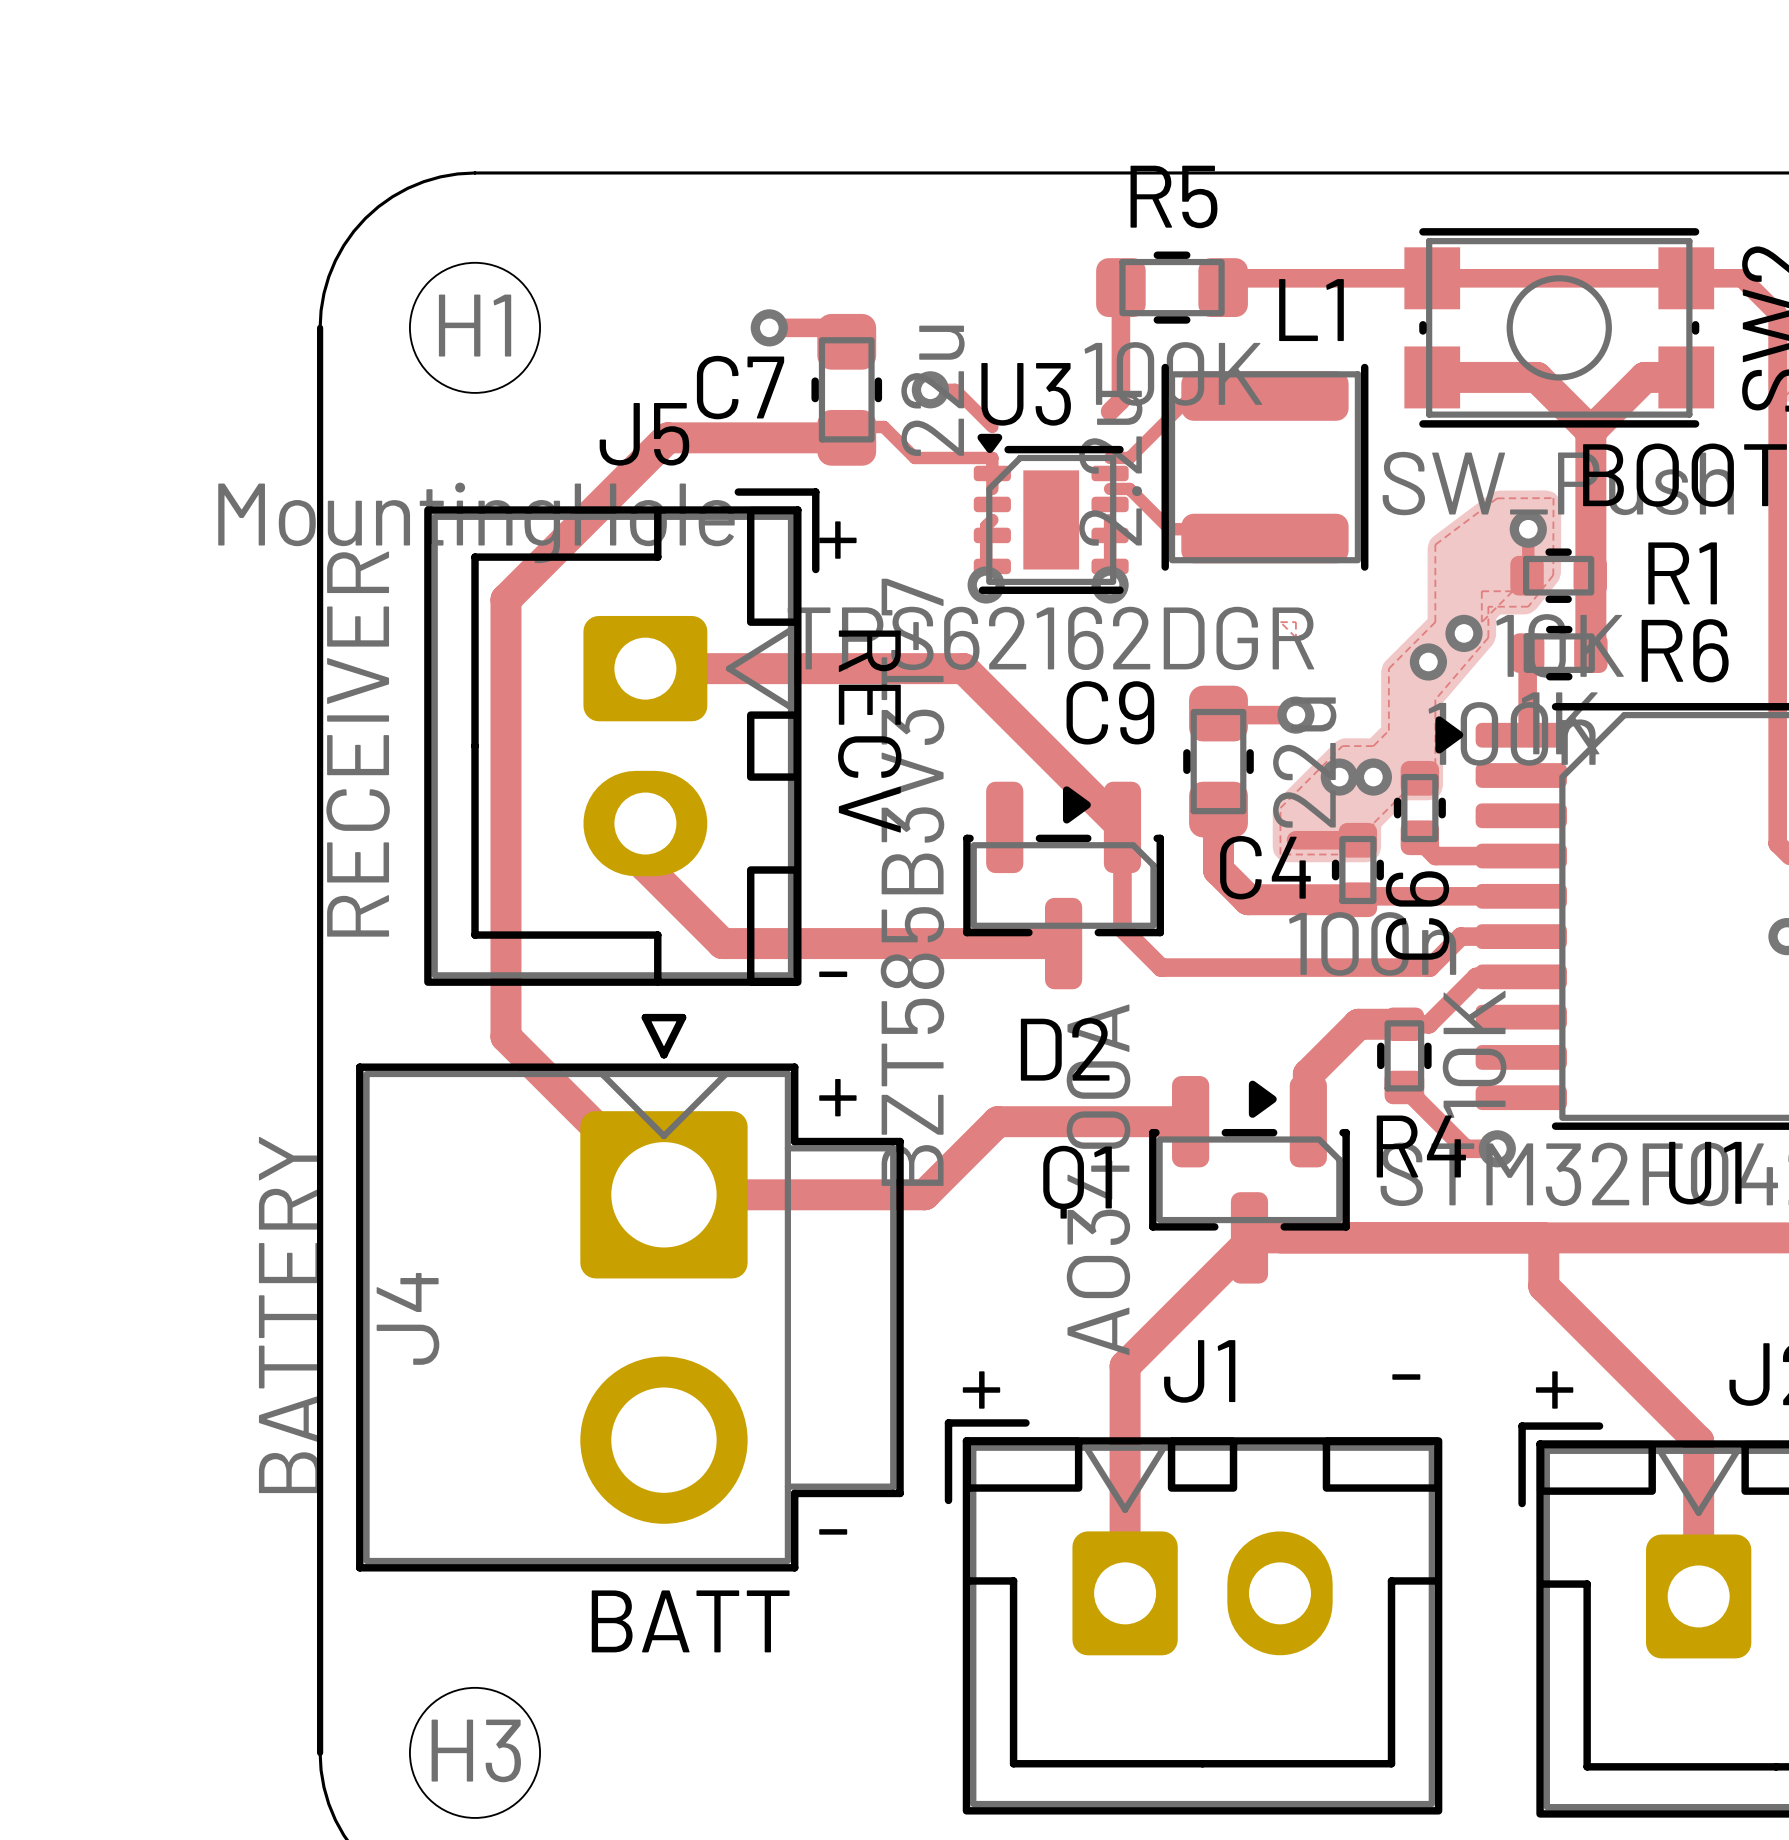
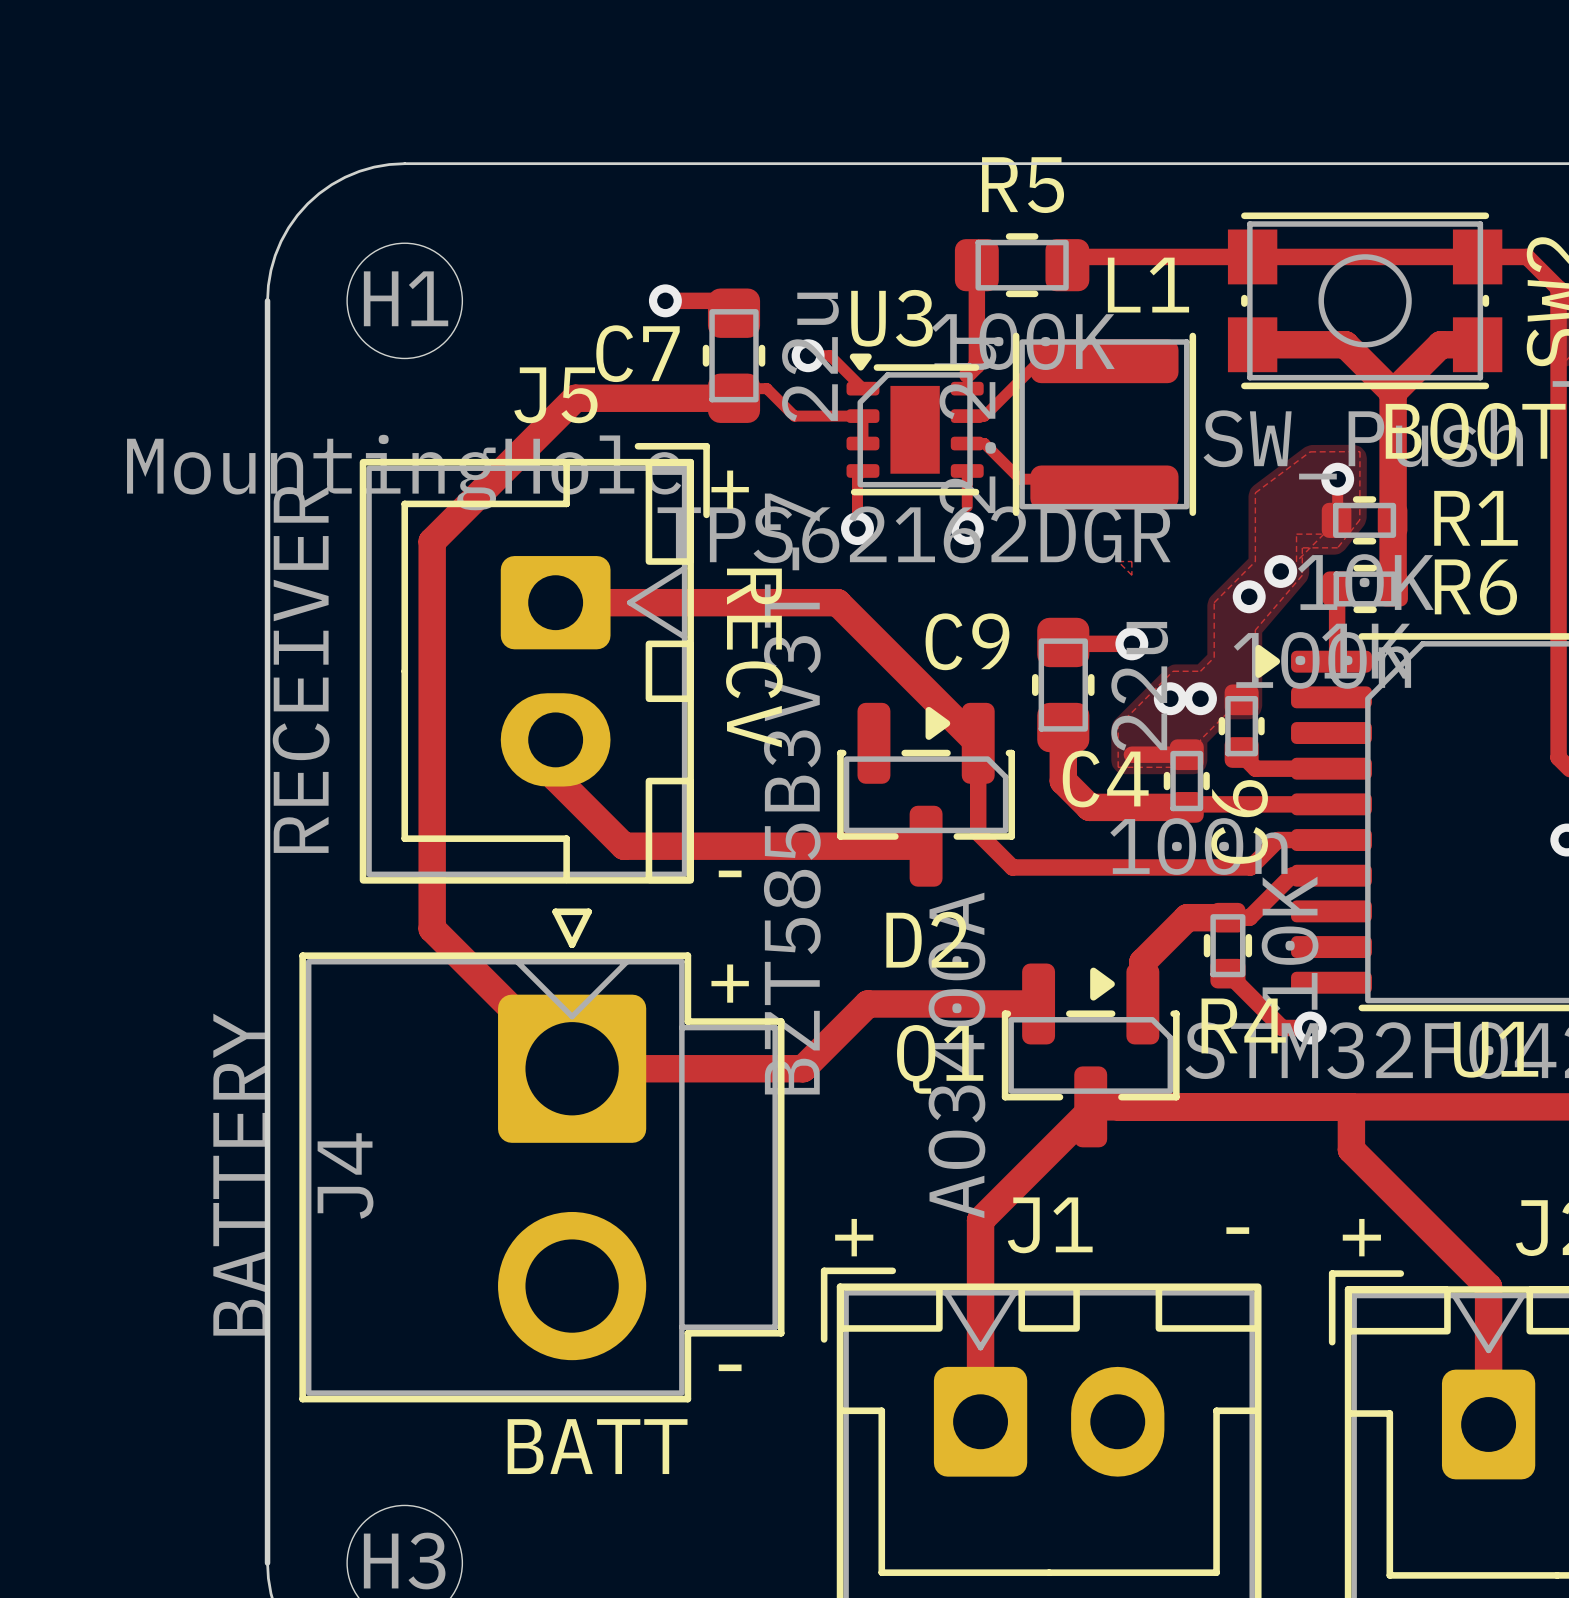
U3 position: (1051, 513) -> (915, 424)

